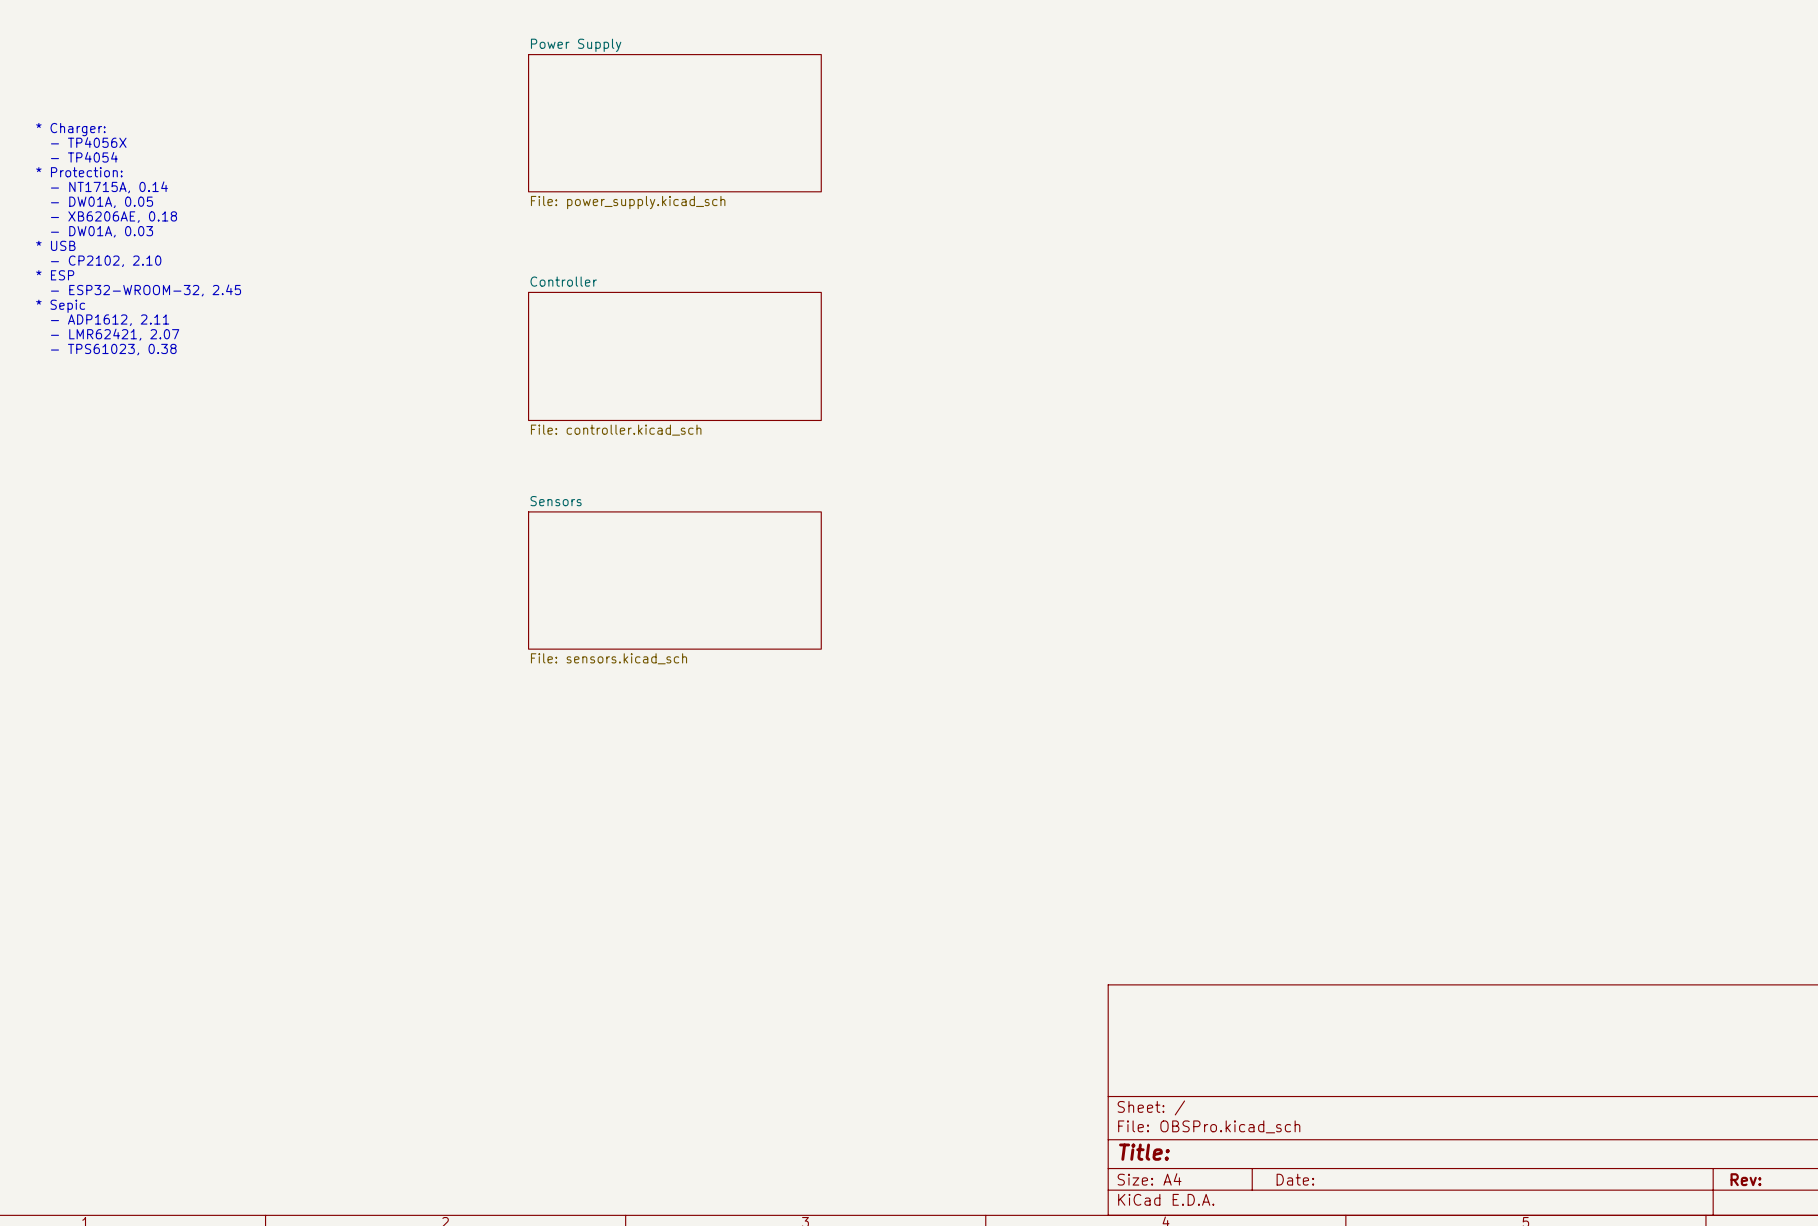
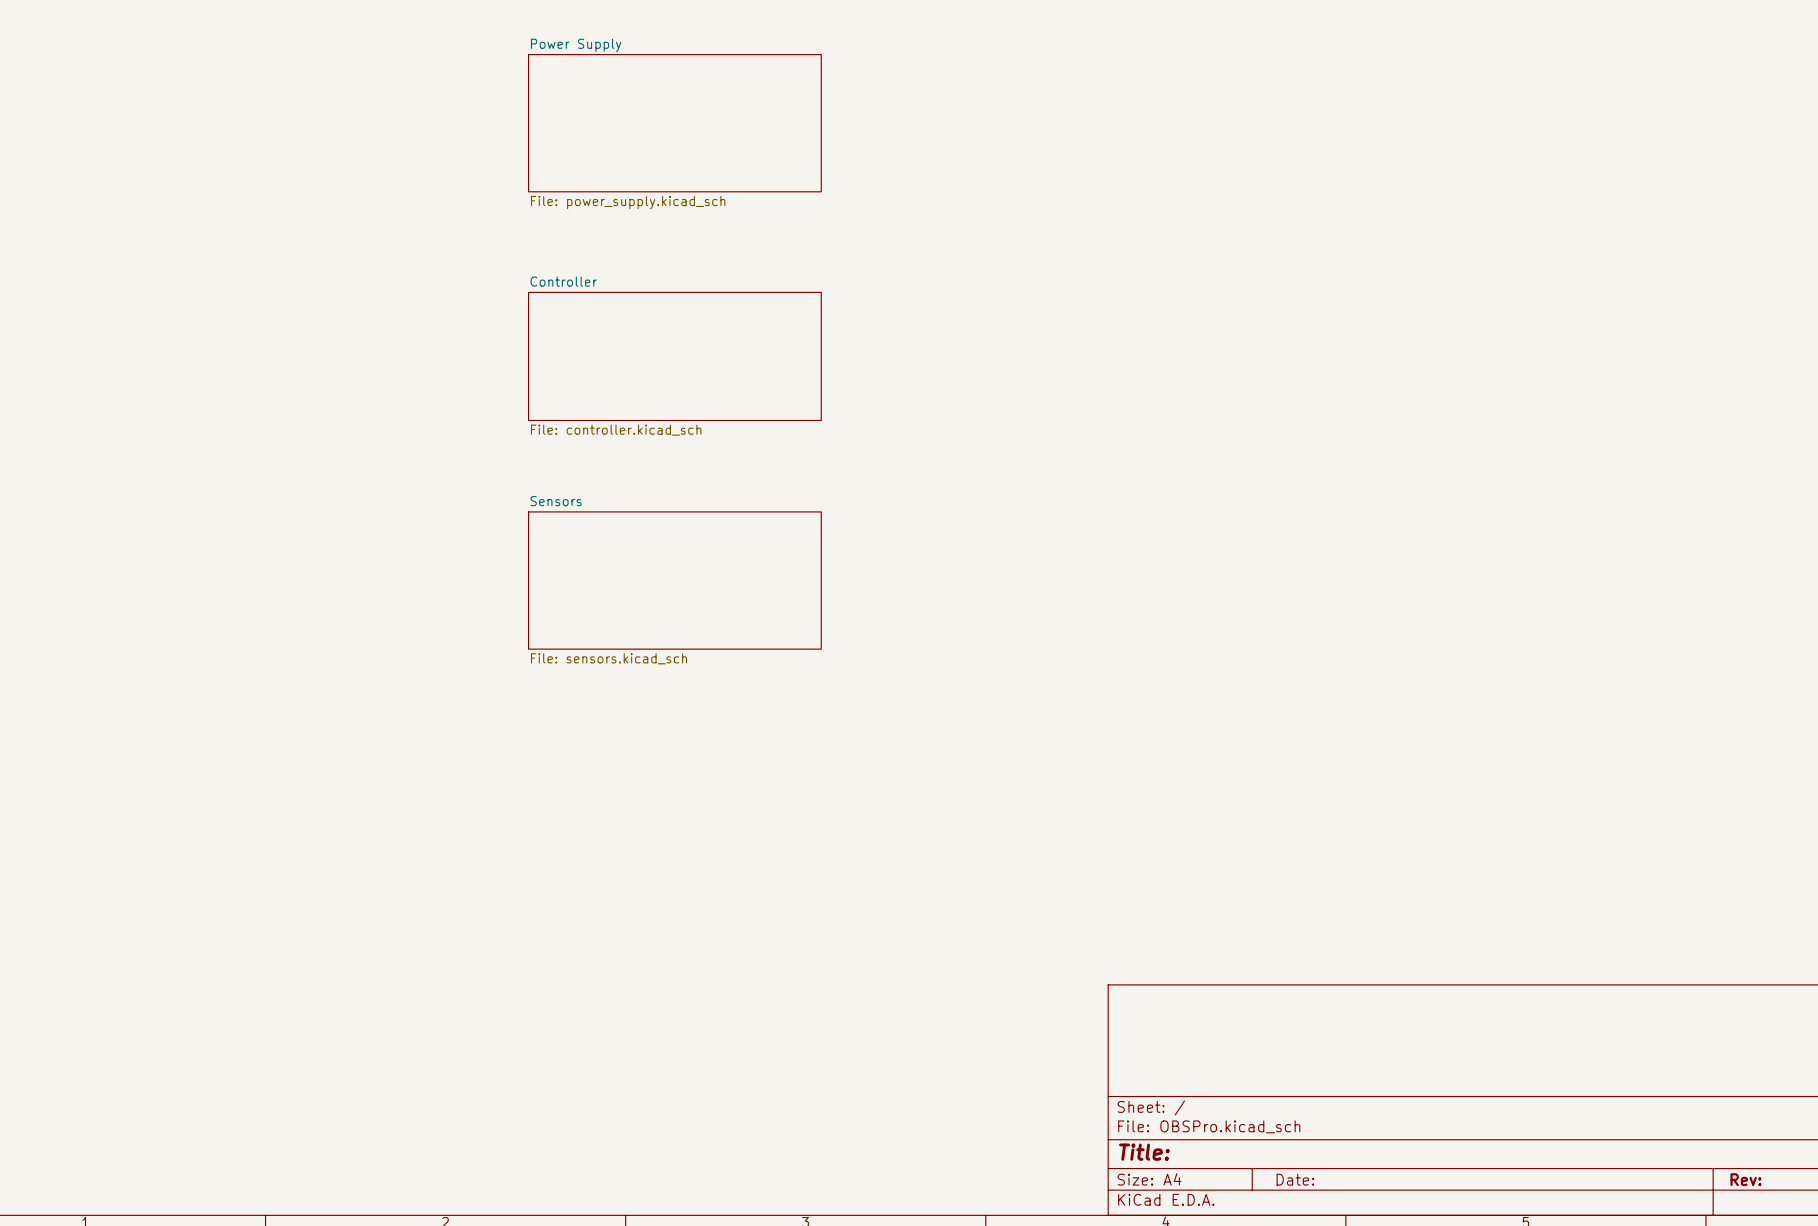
text: * Charger: (70, 129) -> none
text: - TP4056X (88, 142) -> none
text: - TP4054 (84, 157) -> none
text: * Protection: (79, 172) -> none
text: - NT1715A, 0.14 (109, 187) -> none
text: - DW01A, 0.05 (102, 202) -> none
text: - XB6206AE, 0.18 (113, 217) -> none
text: - DW01A, 0.03 (102, 231) -> none
text: * USB (55, 245) -> none
text: - CP2102, 2.10 (106, 261) -> none
text: * ESP (55, 275) -> none
text: - ESP32-WROOM-32, 2.45 (146, 290) -> none
text: * Sepic (60, 306) -> none
text: - ADP1612, 2.11 (110, 320) -> none
text: - LMR62421, 2.07 (115, 334) -> none
text: - TPS61023, 0.38 (113, 349) -> none

